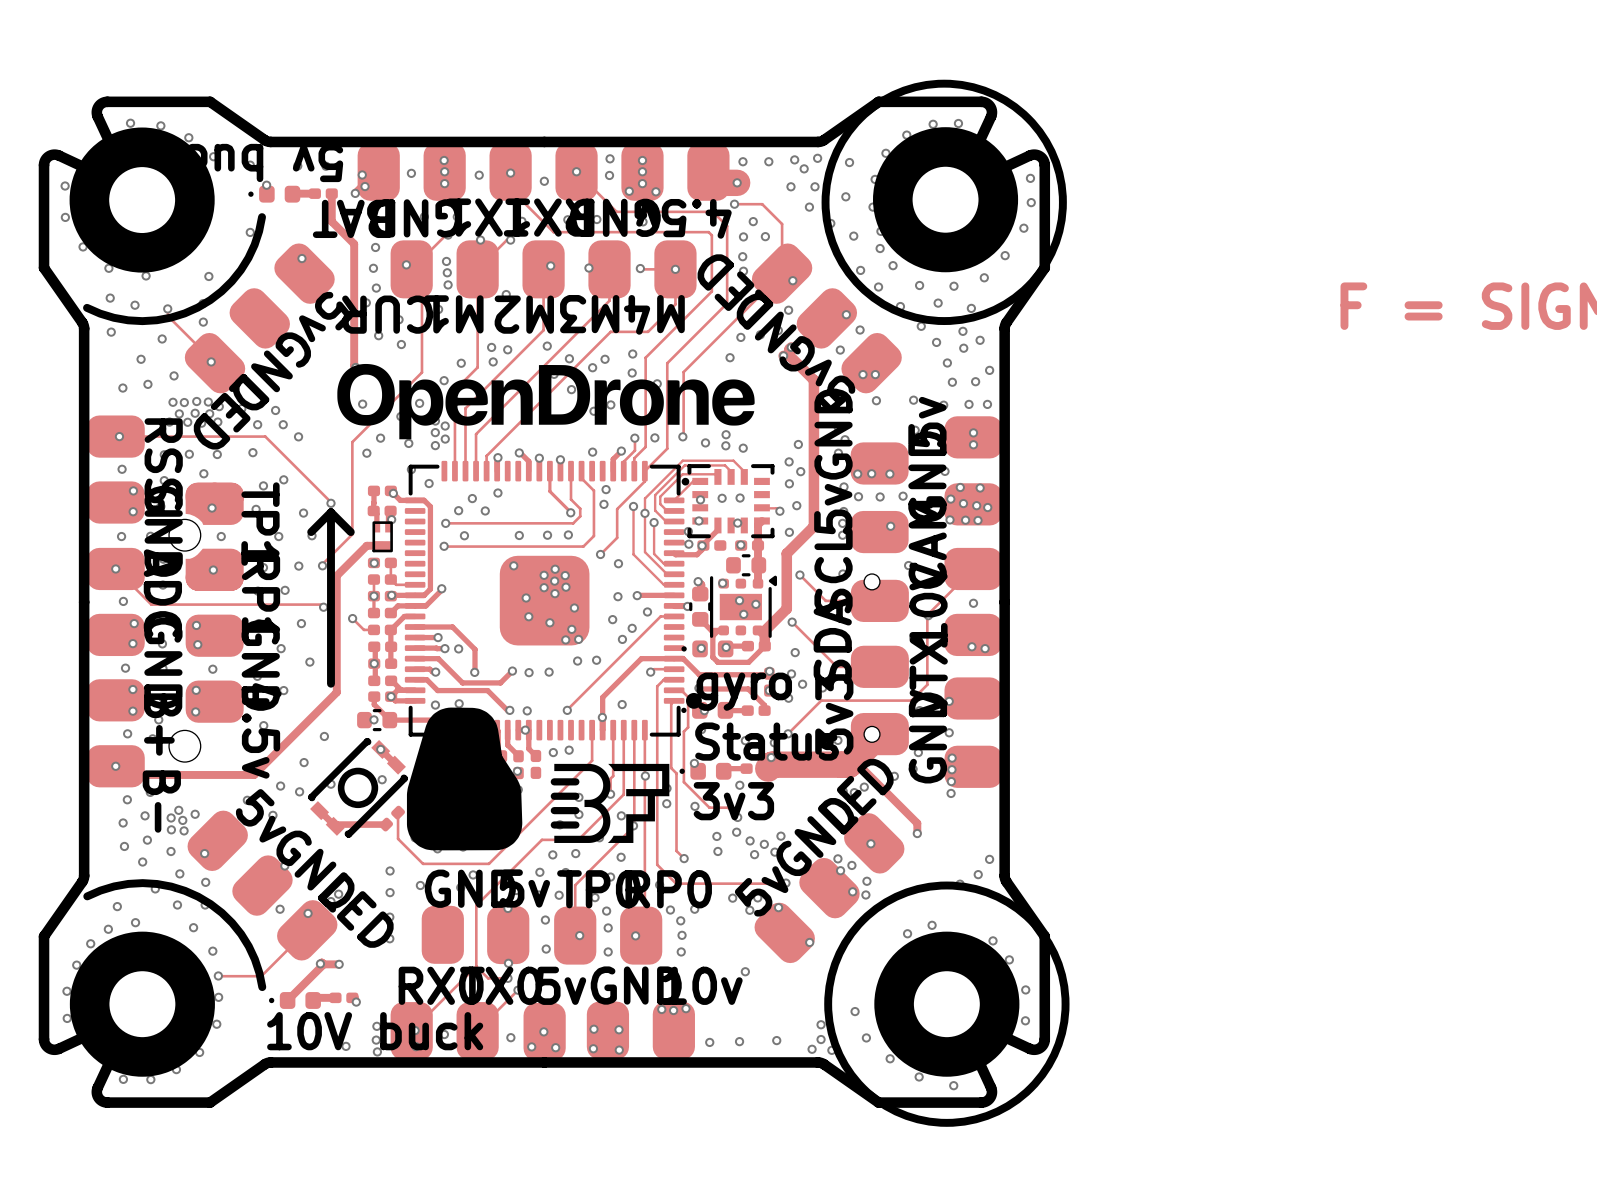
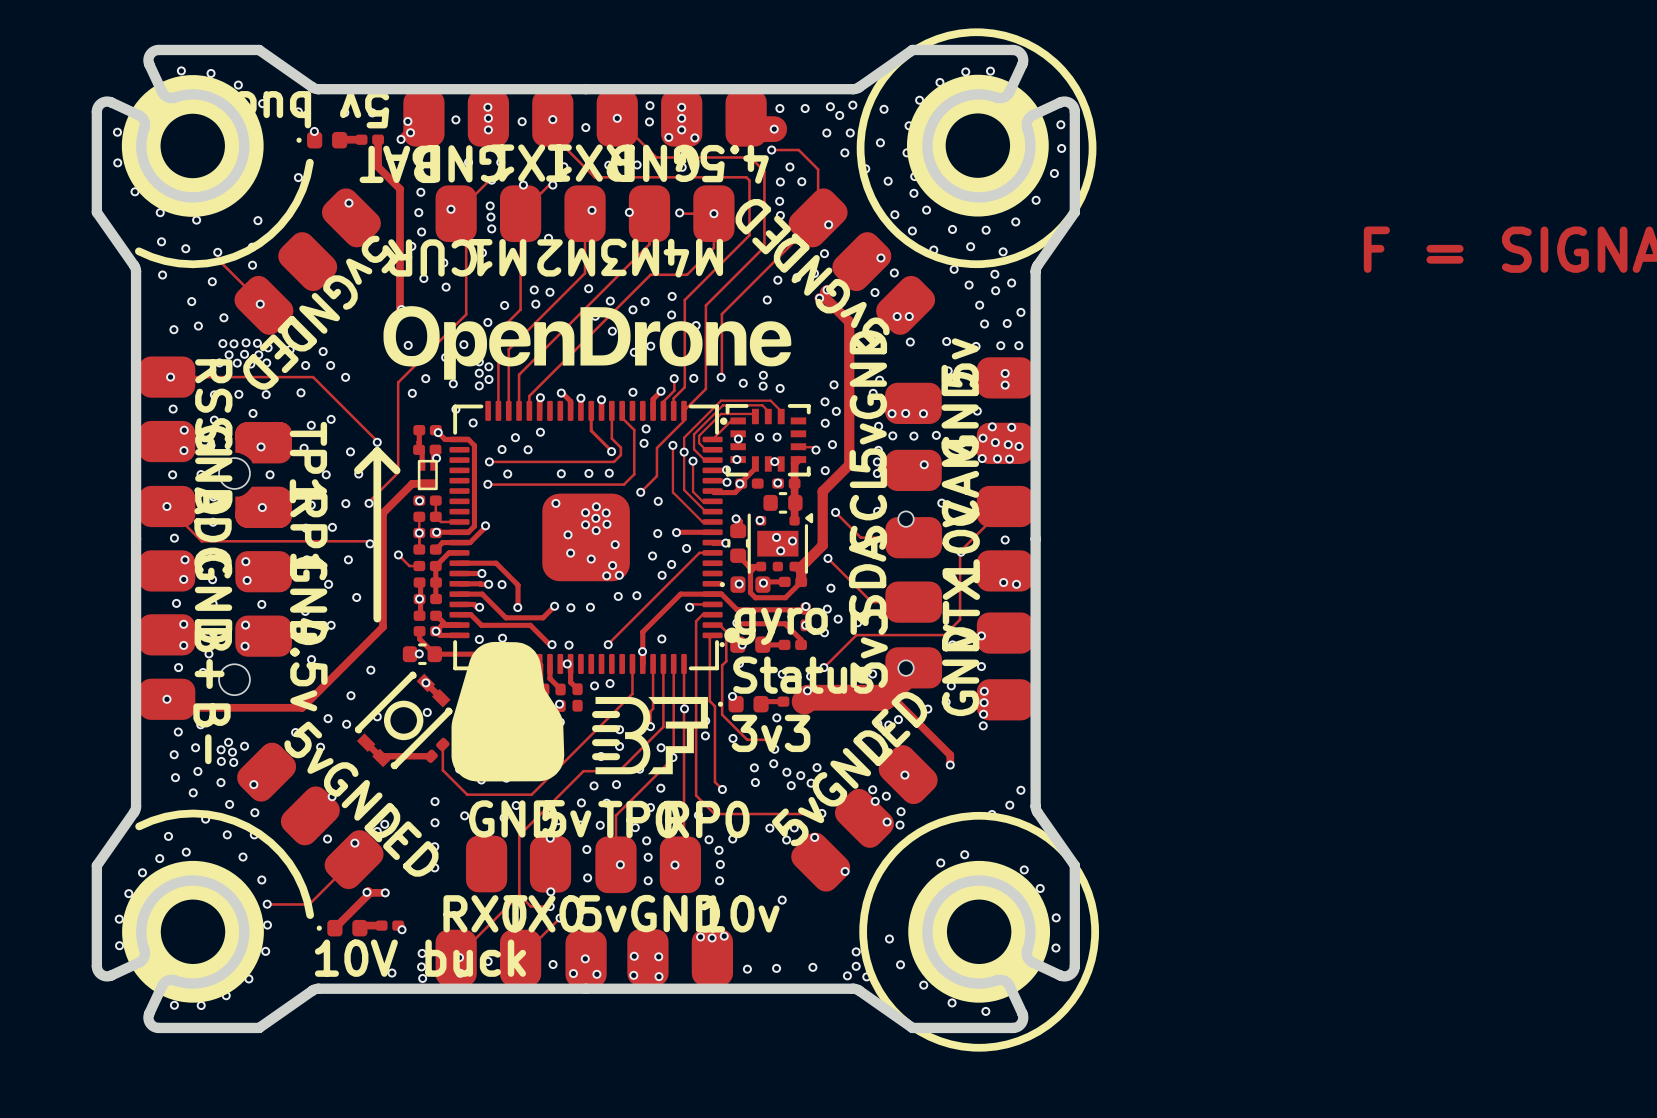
part footprint: [710, 575, 778, 638] -> [747, 513, 814, 574]

